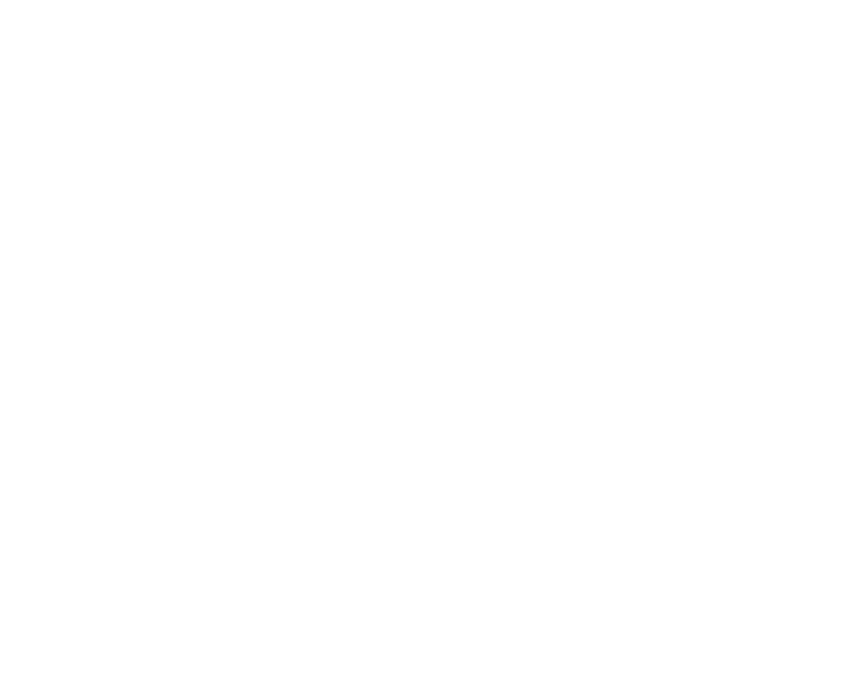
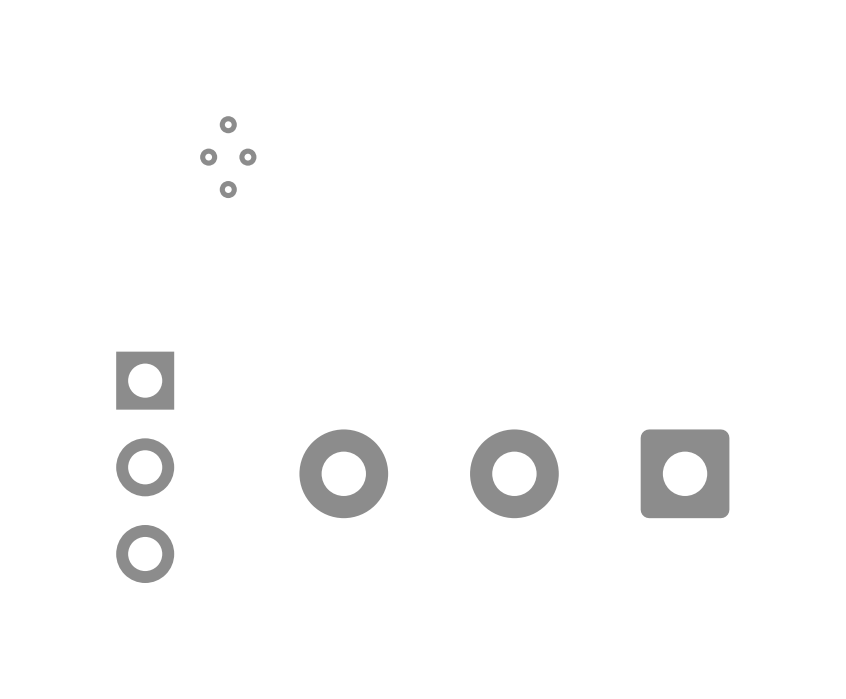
part: none -> (228, 157)
part: none -> (145, 467)
part: none -> (514, 473)

